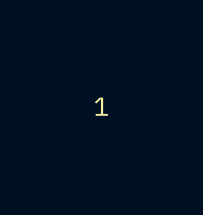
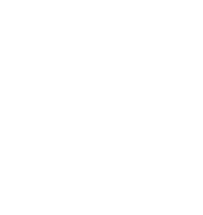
text: 1 (101, 106) -> none

